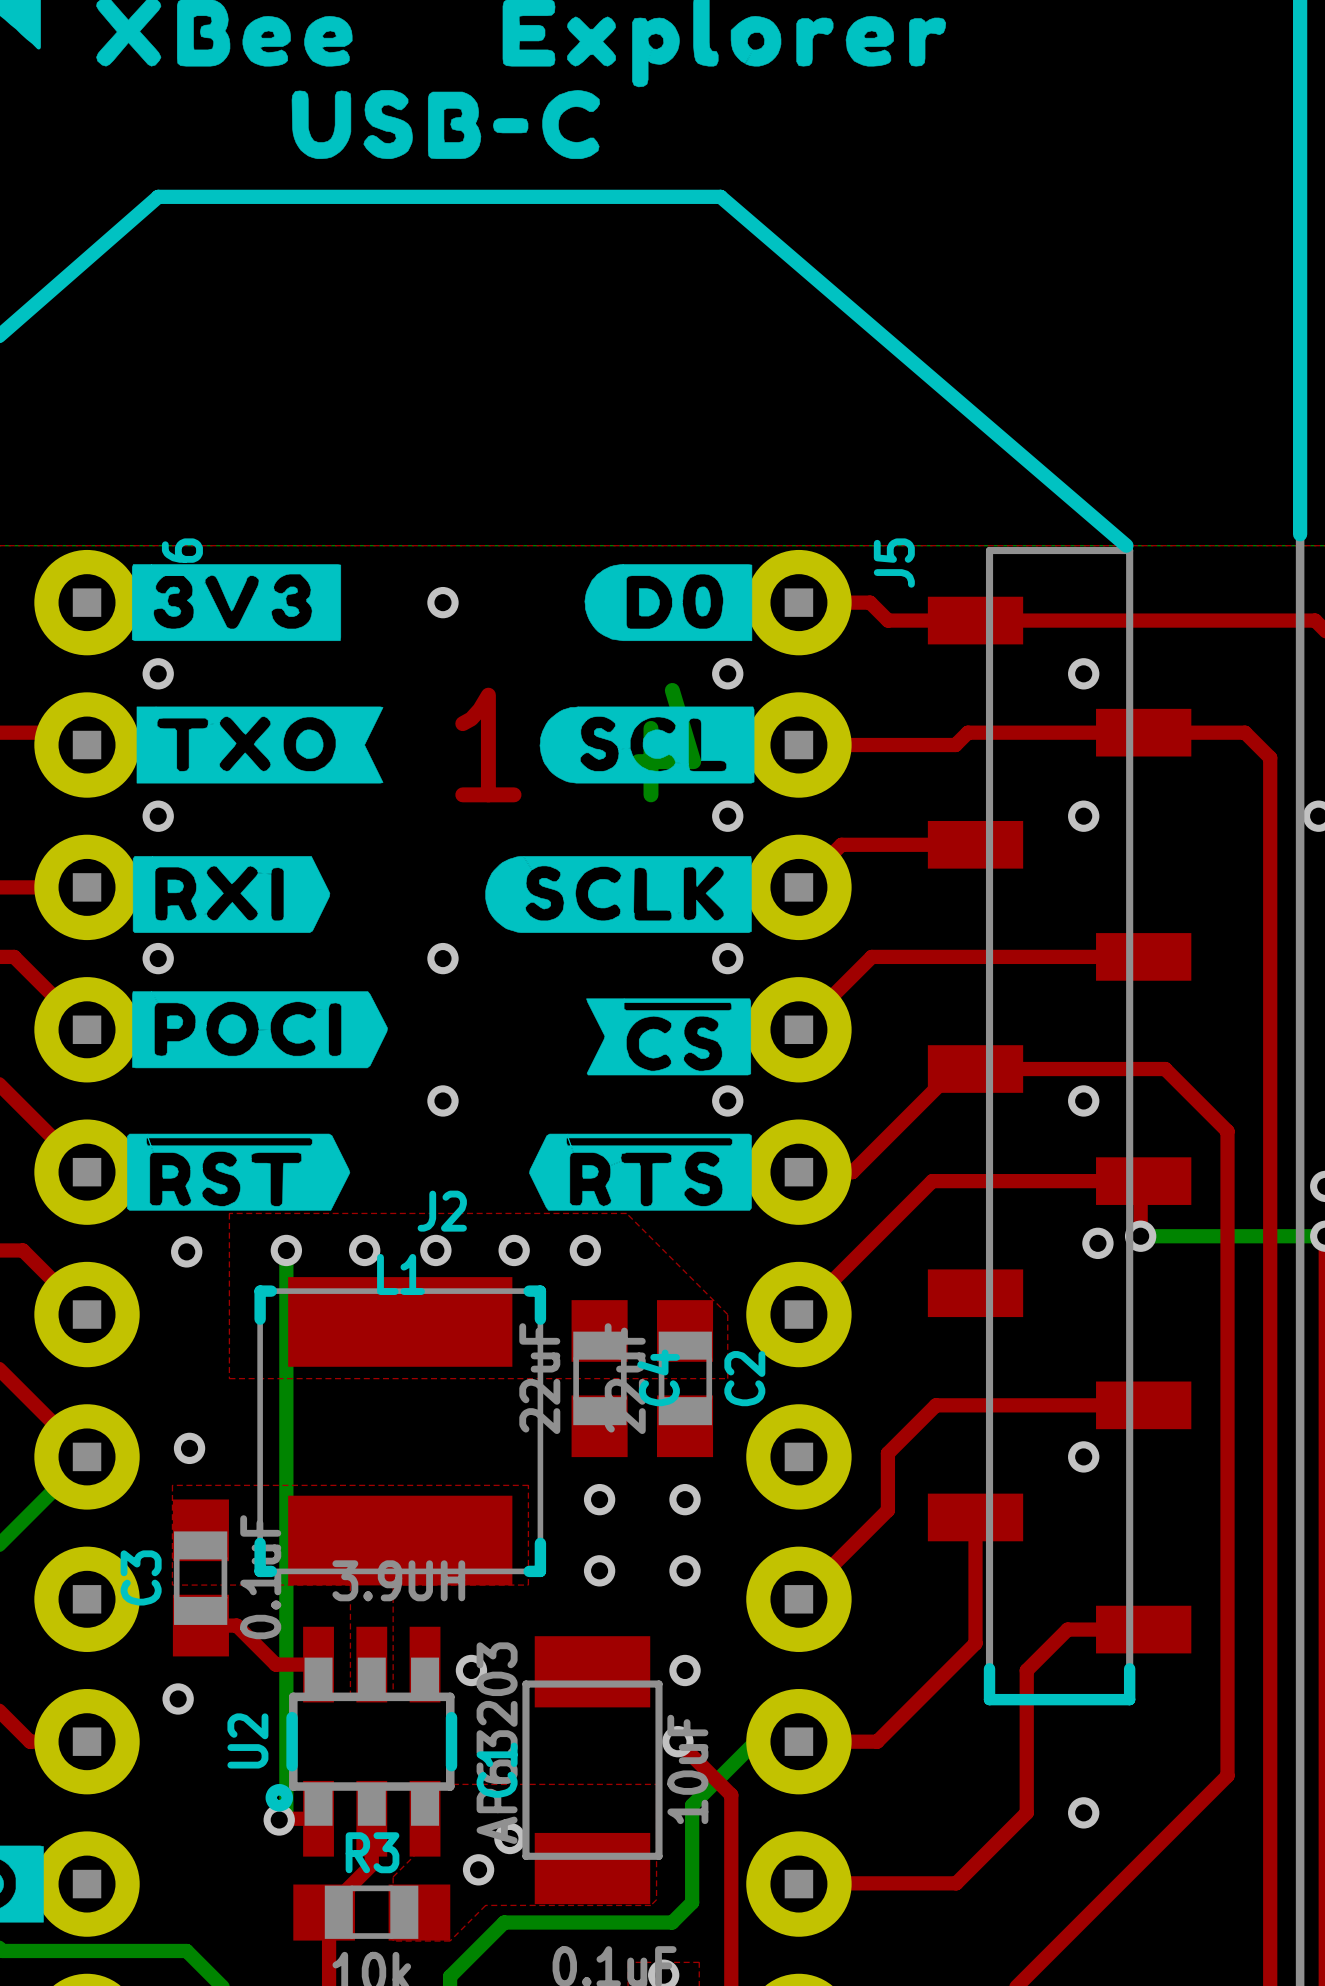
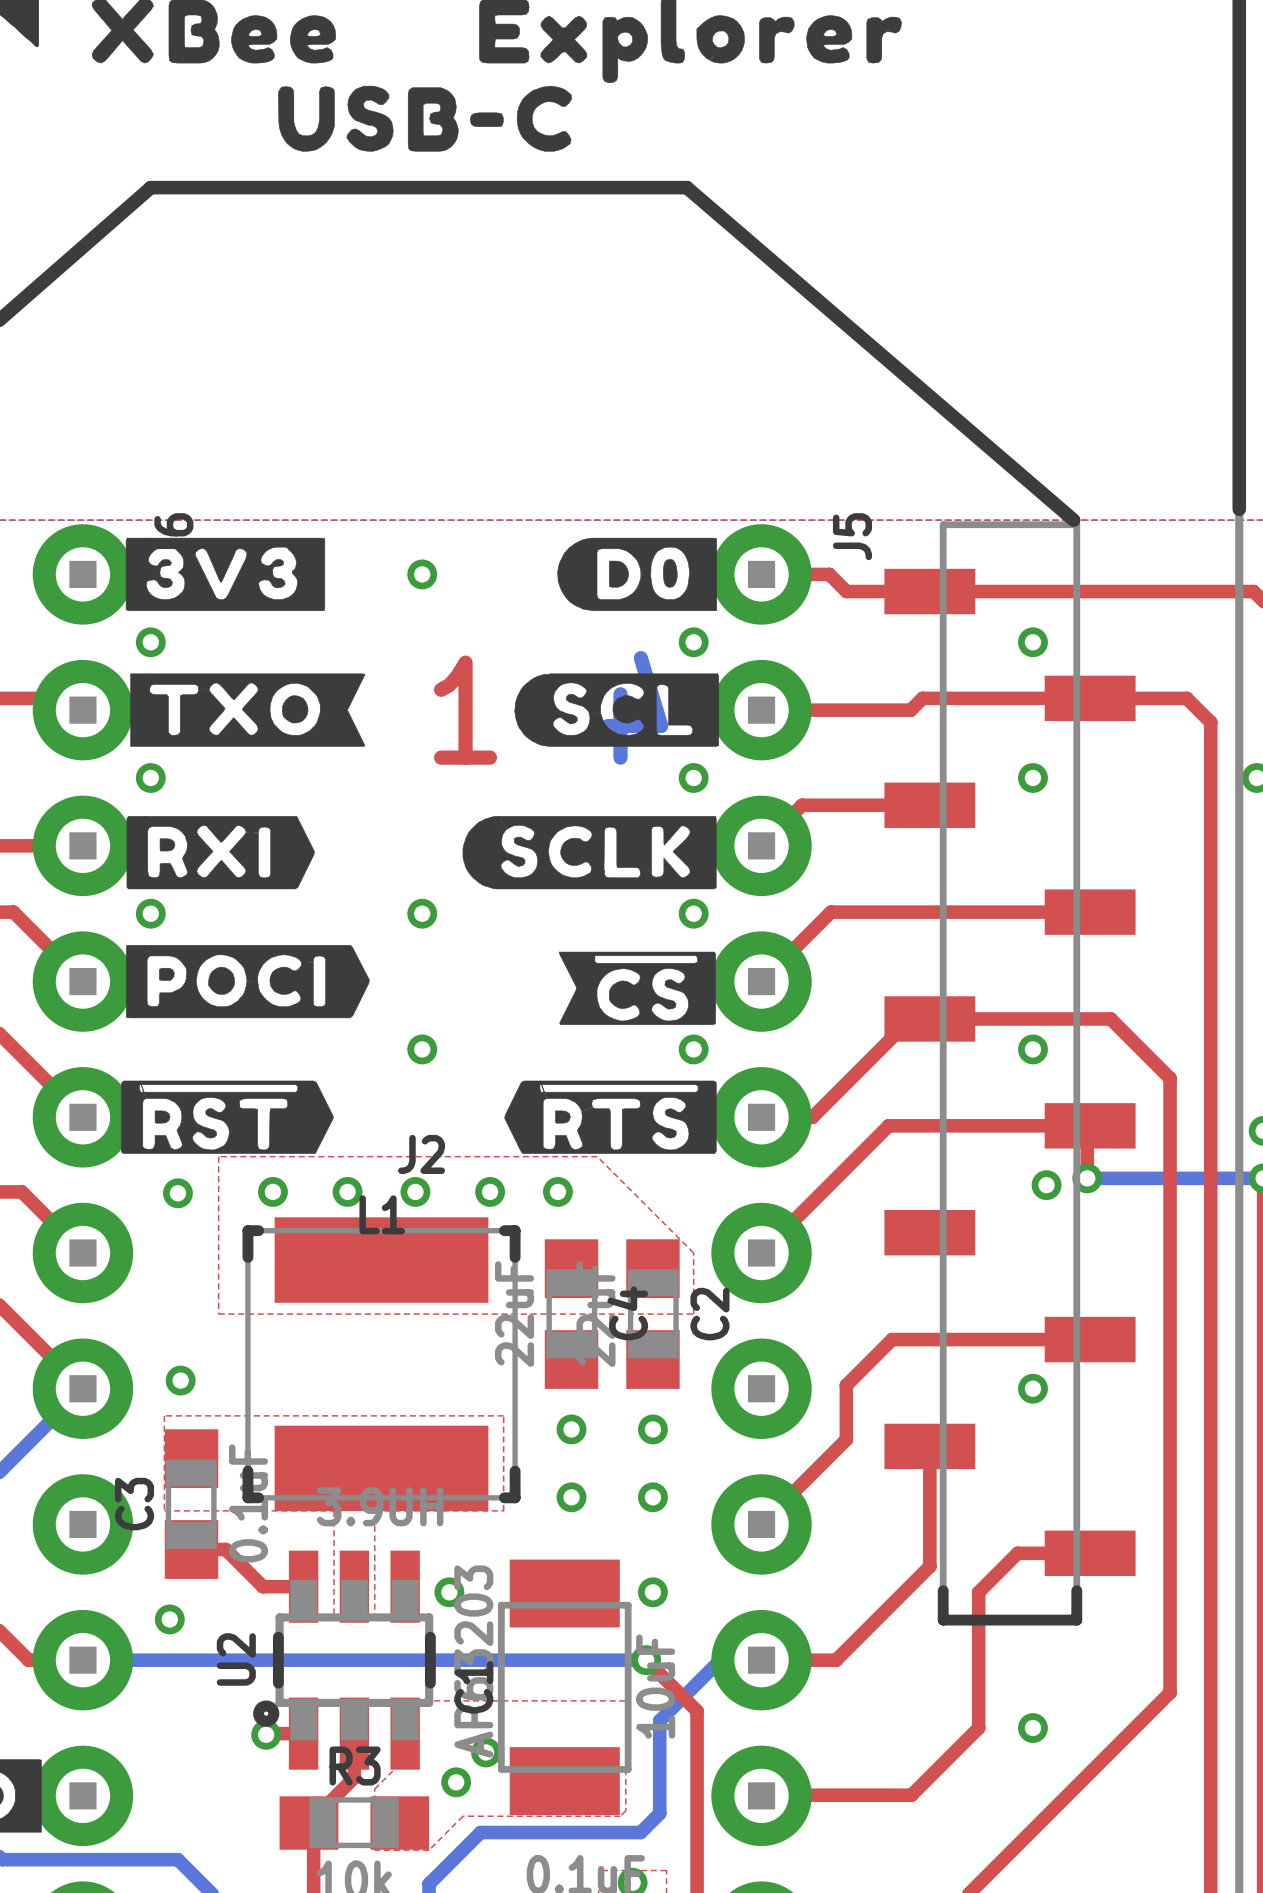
bottom track: (286, 1250) (286, 1812) (279, 1820) -> none
bottom track: none -> (82, 1660) (646, 1660)

